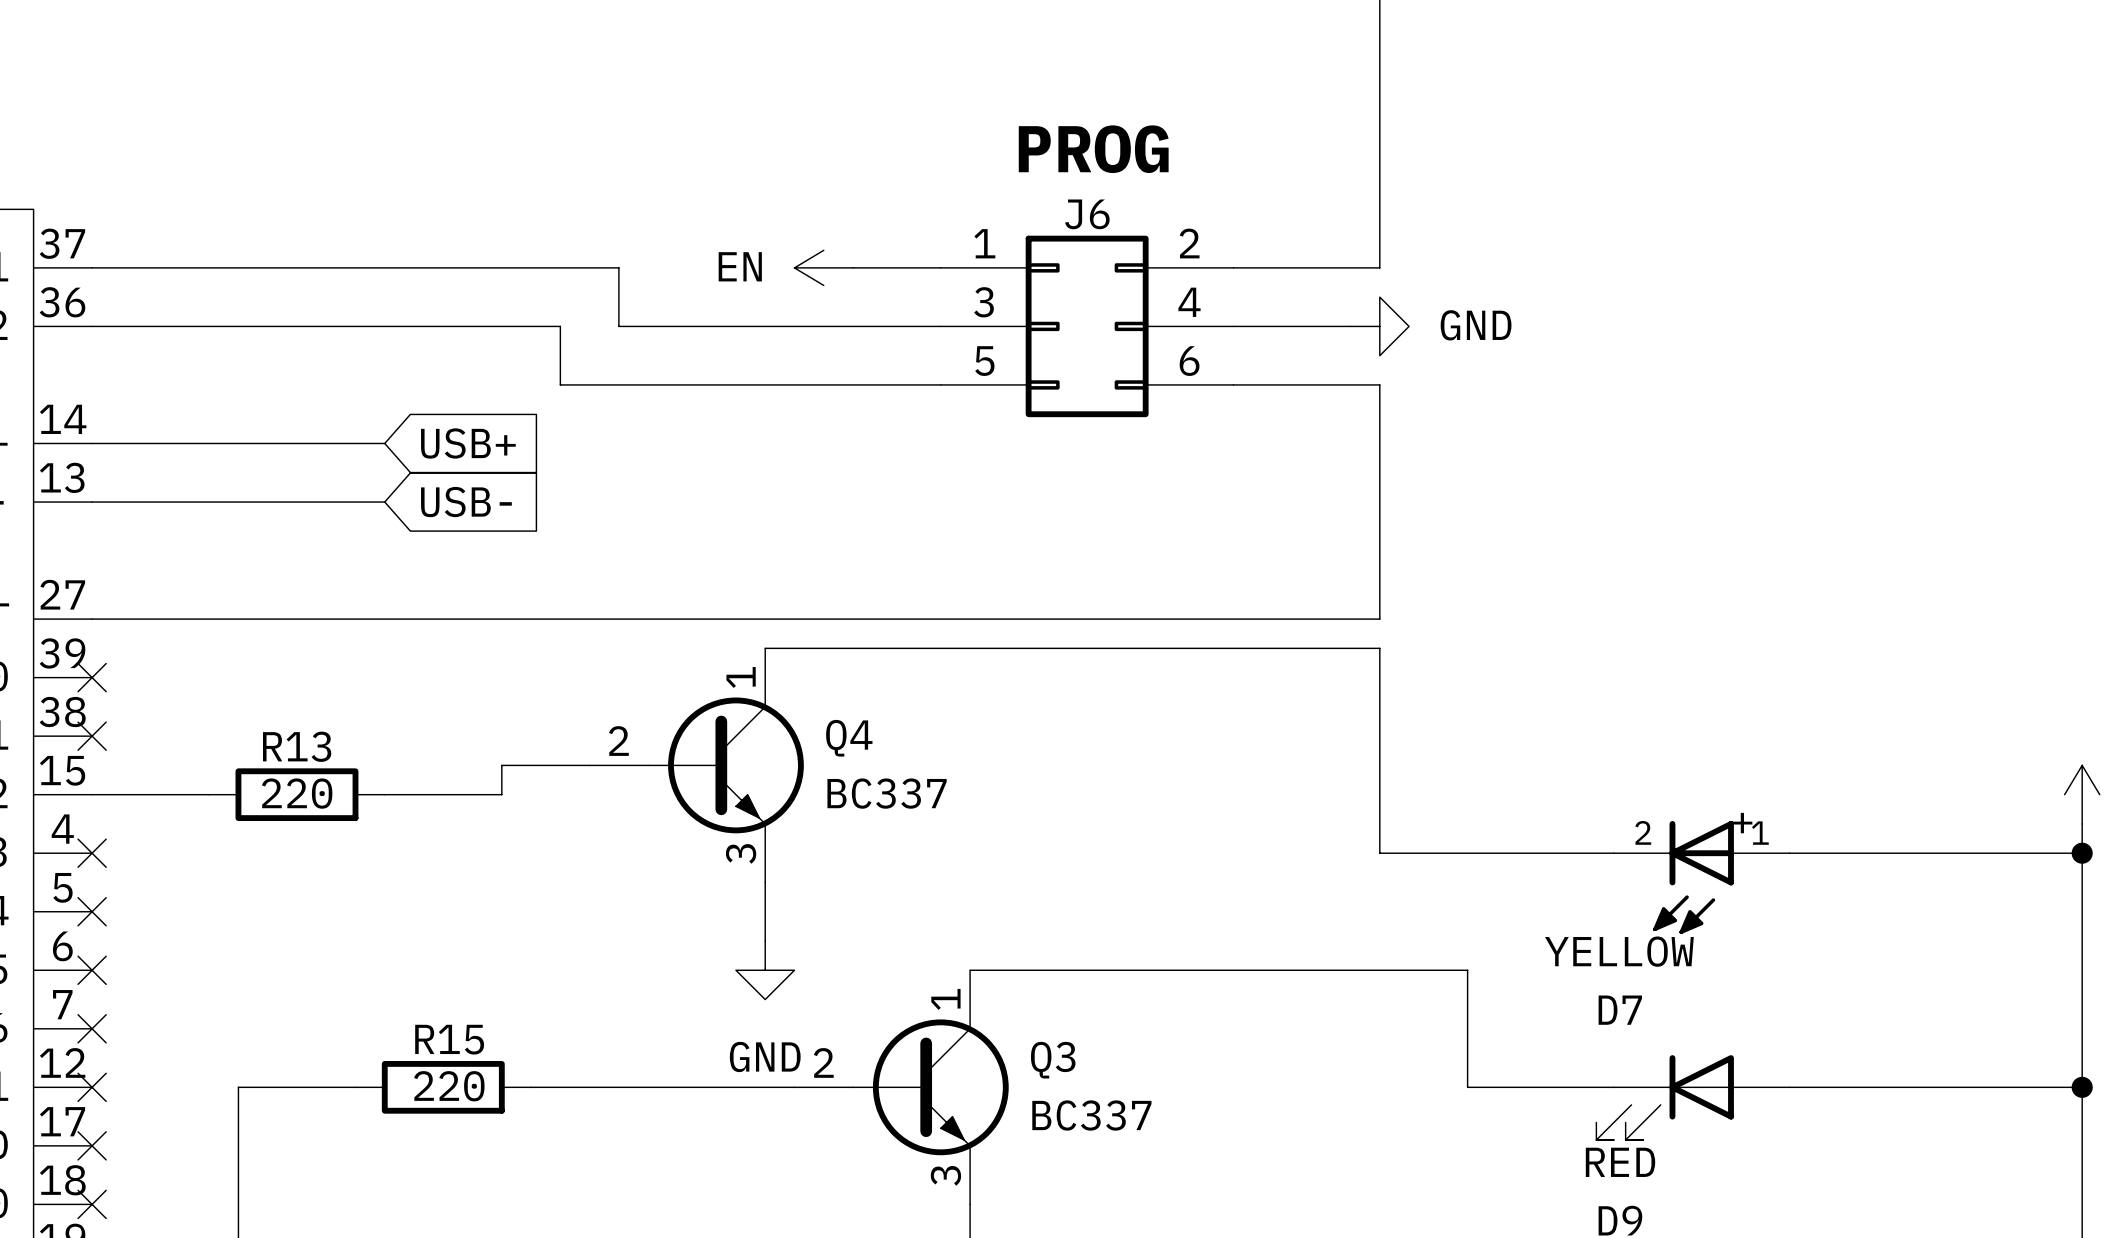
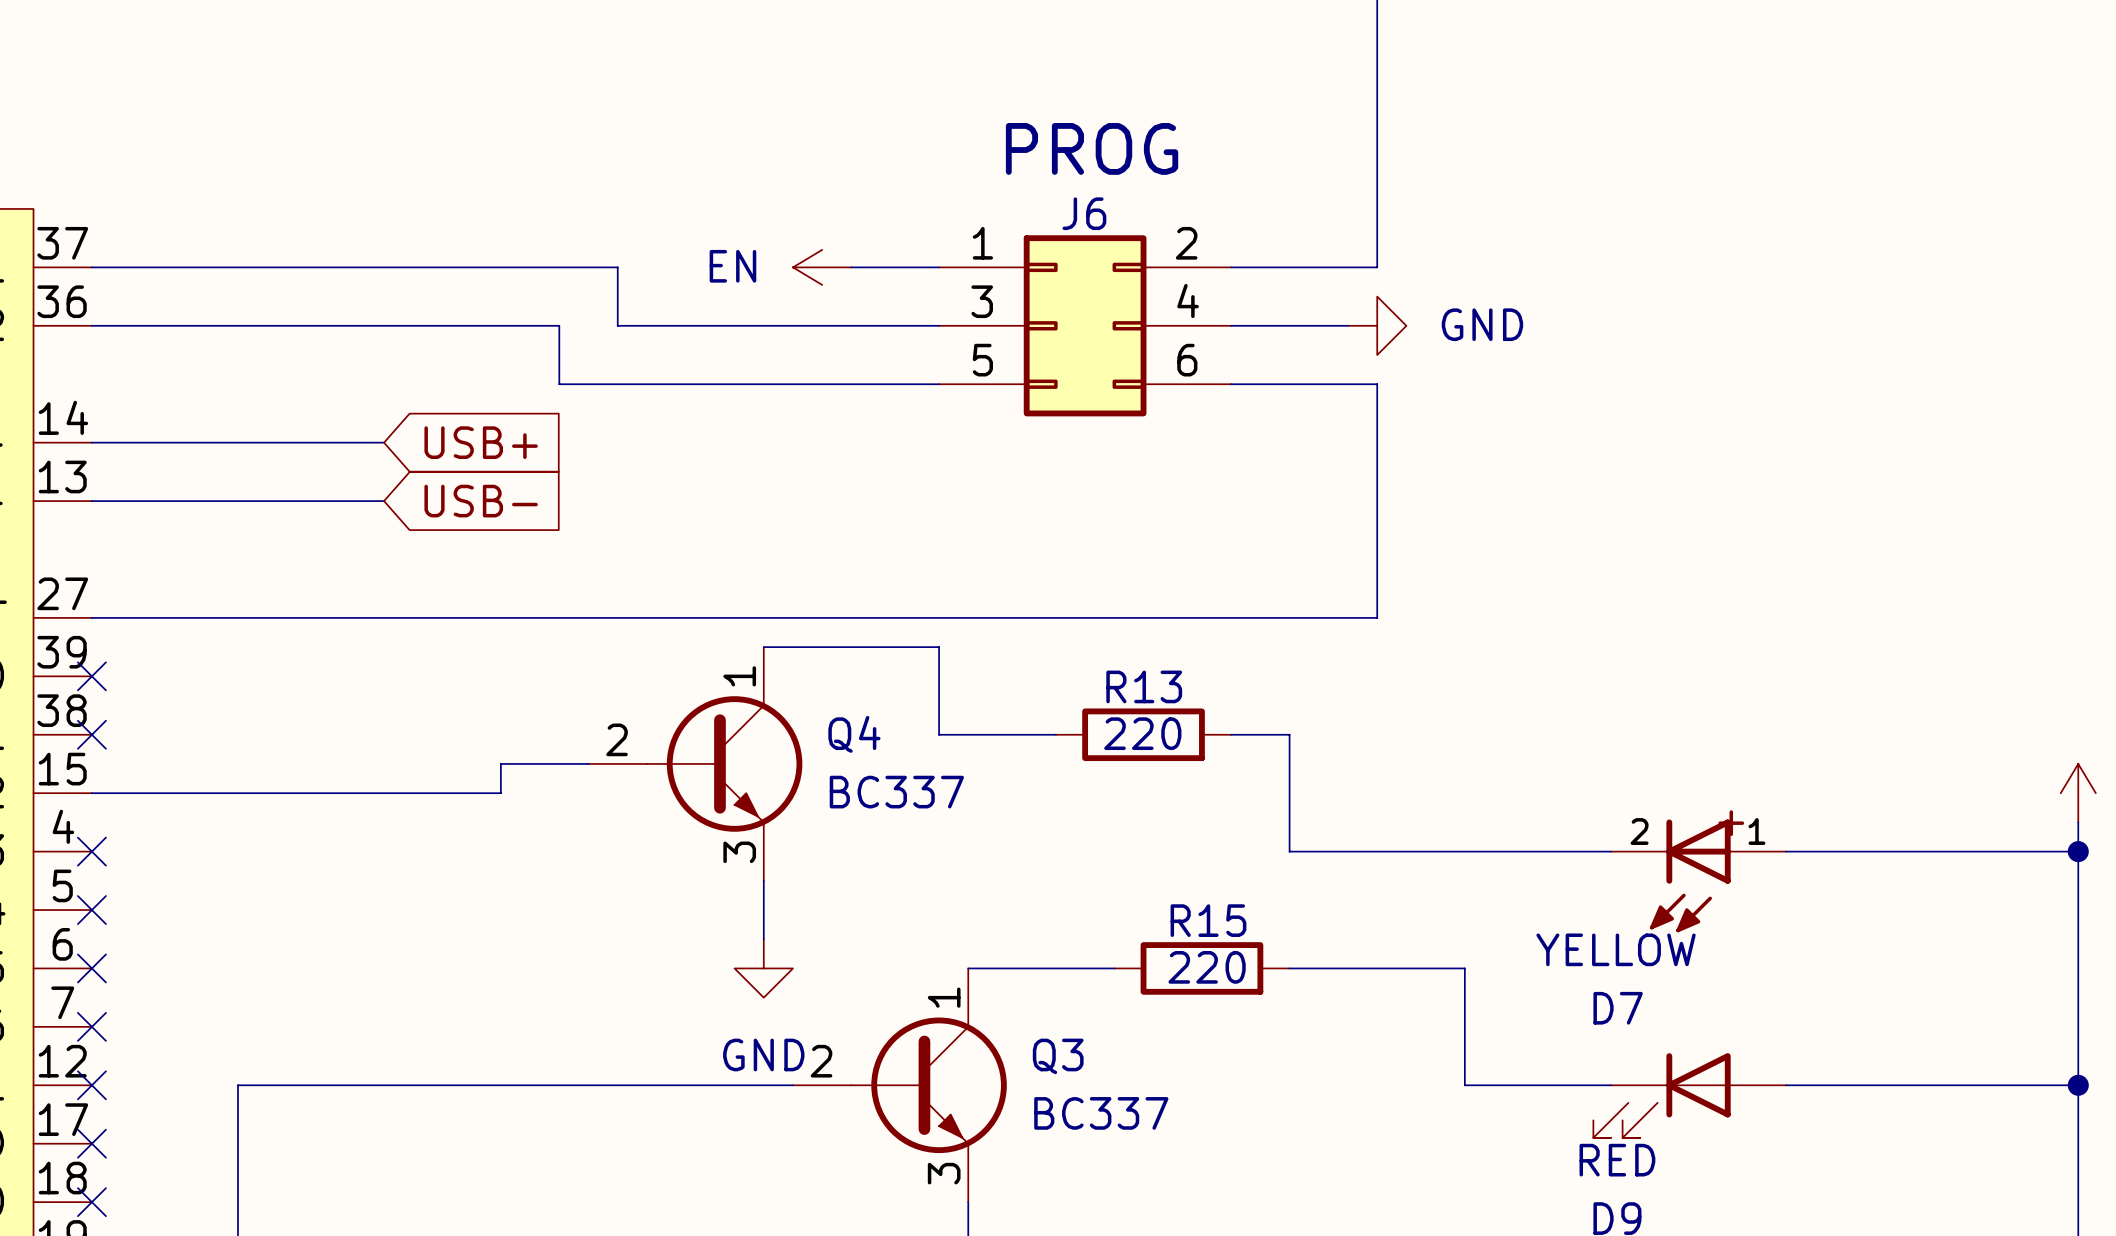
wire: (940, 648) (1379, 648) (1379, 853) -> (1231, 734) (1289, 734) (1289, 851) (1377, 851)
wire: none -> (939, 647) (939, 734) (1055, 734)
wire: none -> (208, 793) (384, 793)
R13 position: (296, 794) -> (1143, 734)
wire: (1116, 970) (1292, 970) -> none
wire: none -> (354, 1085) (530, 1085)
R15 position: (443, 1087) -> (1201, 968)

